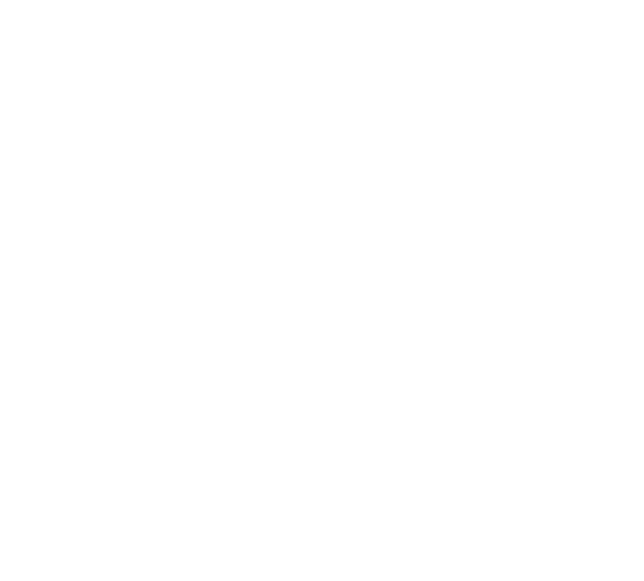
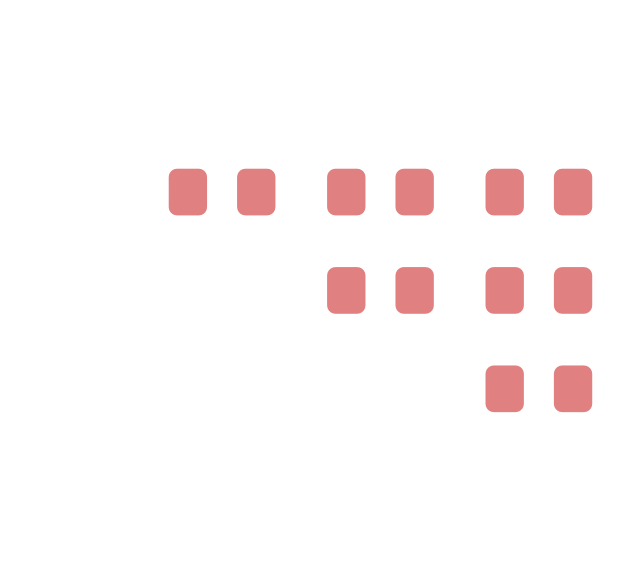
part: none -> (222, 192)
part: none -> (380, 192)
part: none -> (538, 192)
part: none -> (380, 290)
part: none -> (538, 290)
part: none -> (538, 388)

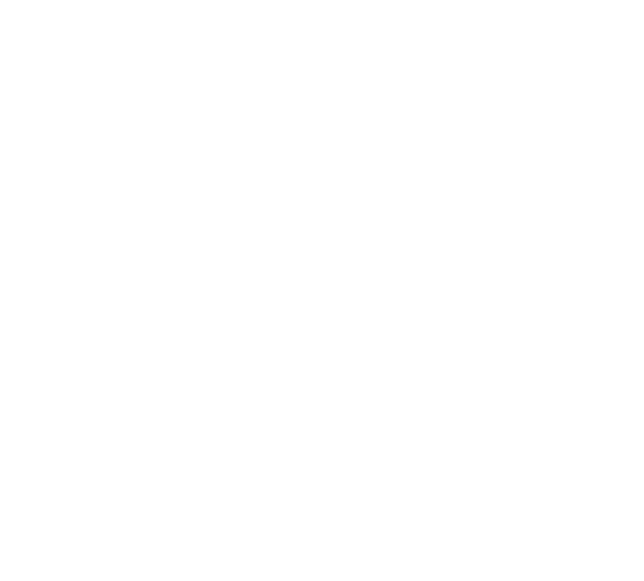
part: (222, 192) -> none
part: (380, 192) -> none
part: (538, 192) -> none
part: (380, 290) -> none
part: (538, 290) -> none
part: (538, 388) -> none

